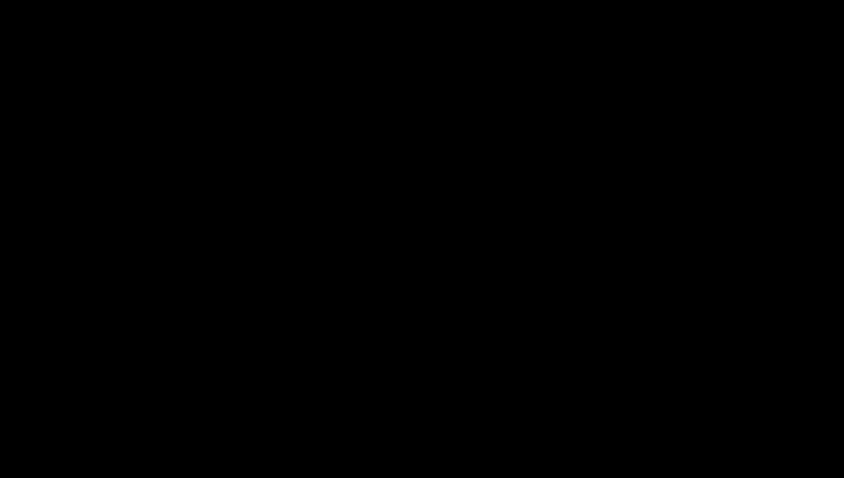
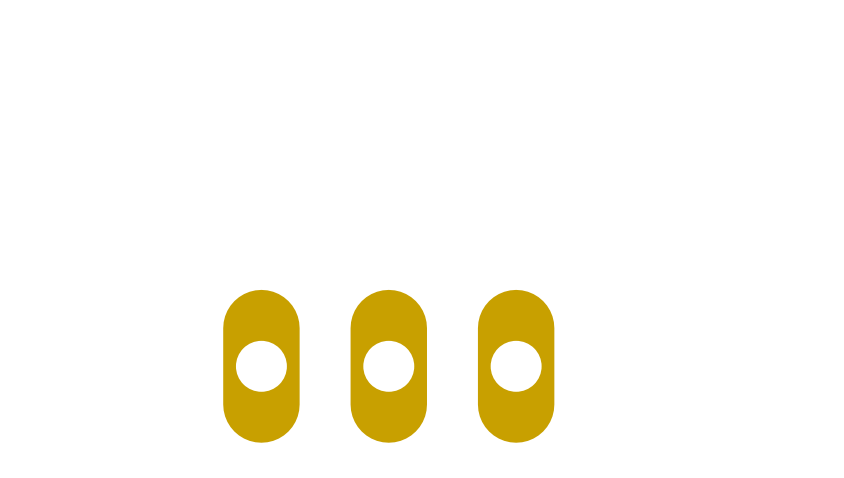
part: none -> (388, 366)

